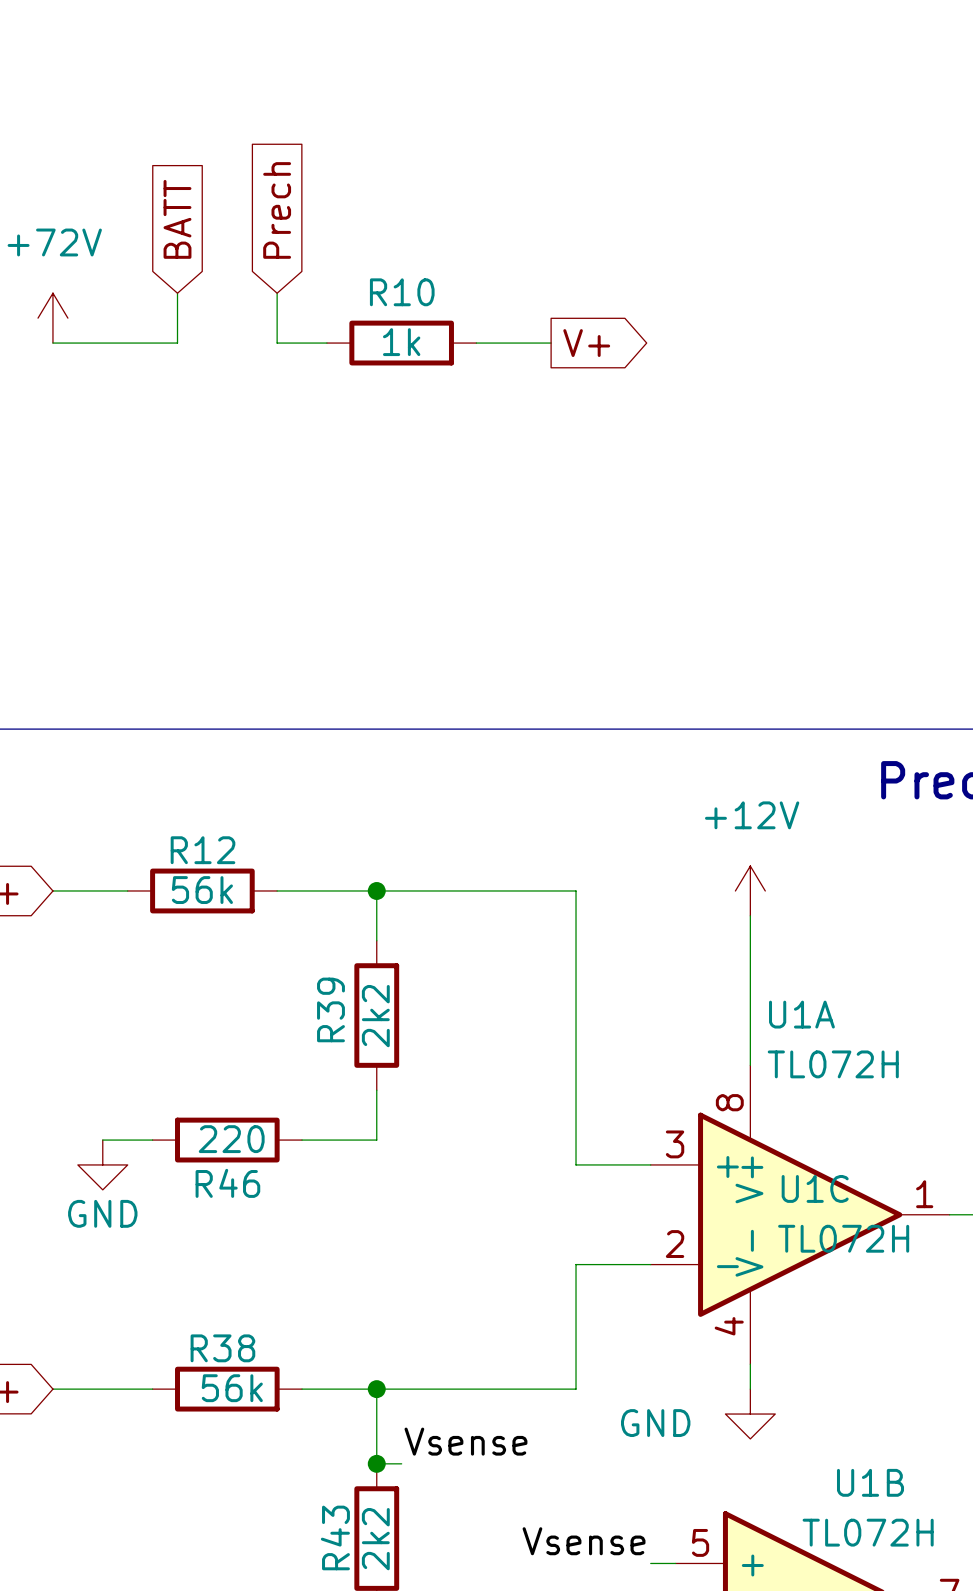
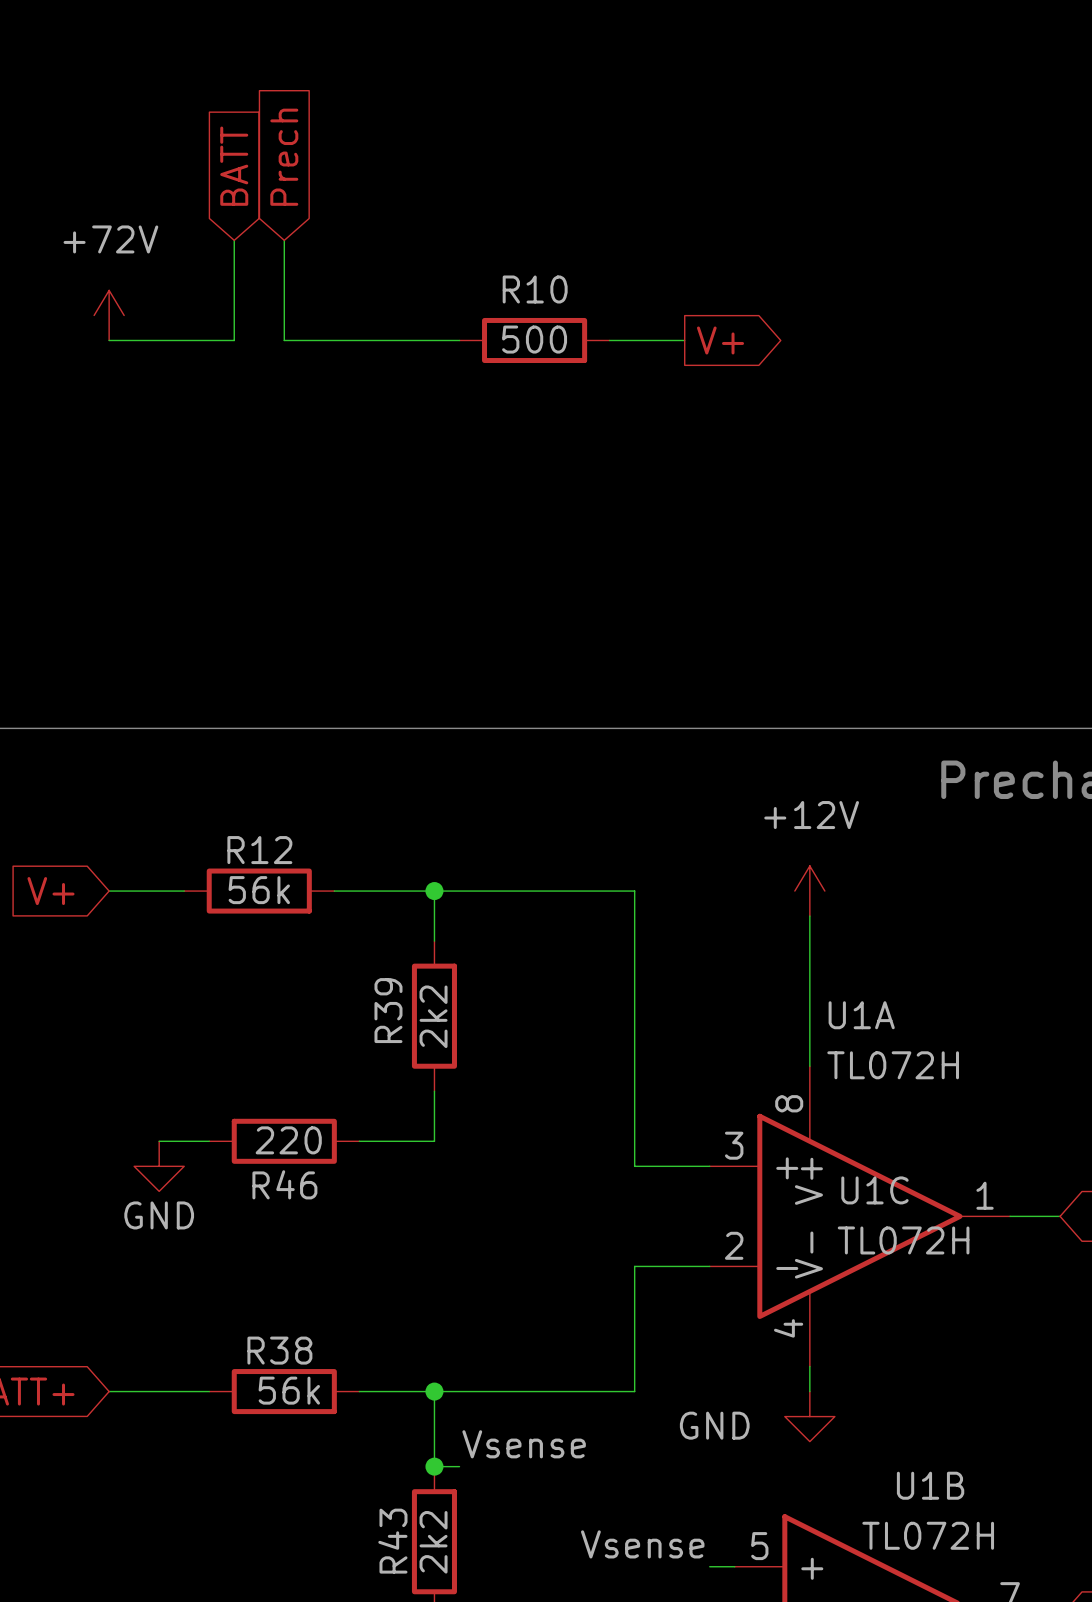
global label position: Prech (277, 210) -> Prech (284, 157)
global label position: BATT (177, 219) -> BATT (234, 166)
wire: none -> (234, 240) (234, 290)
wire: (277, 293) (277, 343) -> (284, 240) (284, 340) (334, 340)
R10 value: 1k (401, 342) -> 500 (534, 339)
wire: none -> (384, 340) (459, 340)
R10 position: (401, 343) -> (534, 340)
wire: (476, 343) (551, 343) -> (684, 340) (609, 340)
global label position: V+ (586, 343) -> V+ (720, 340)

